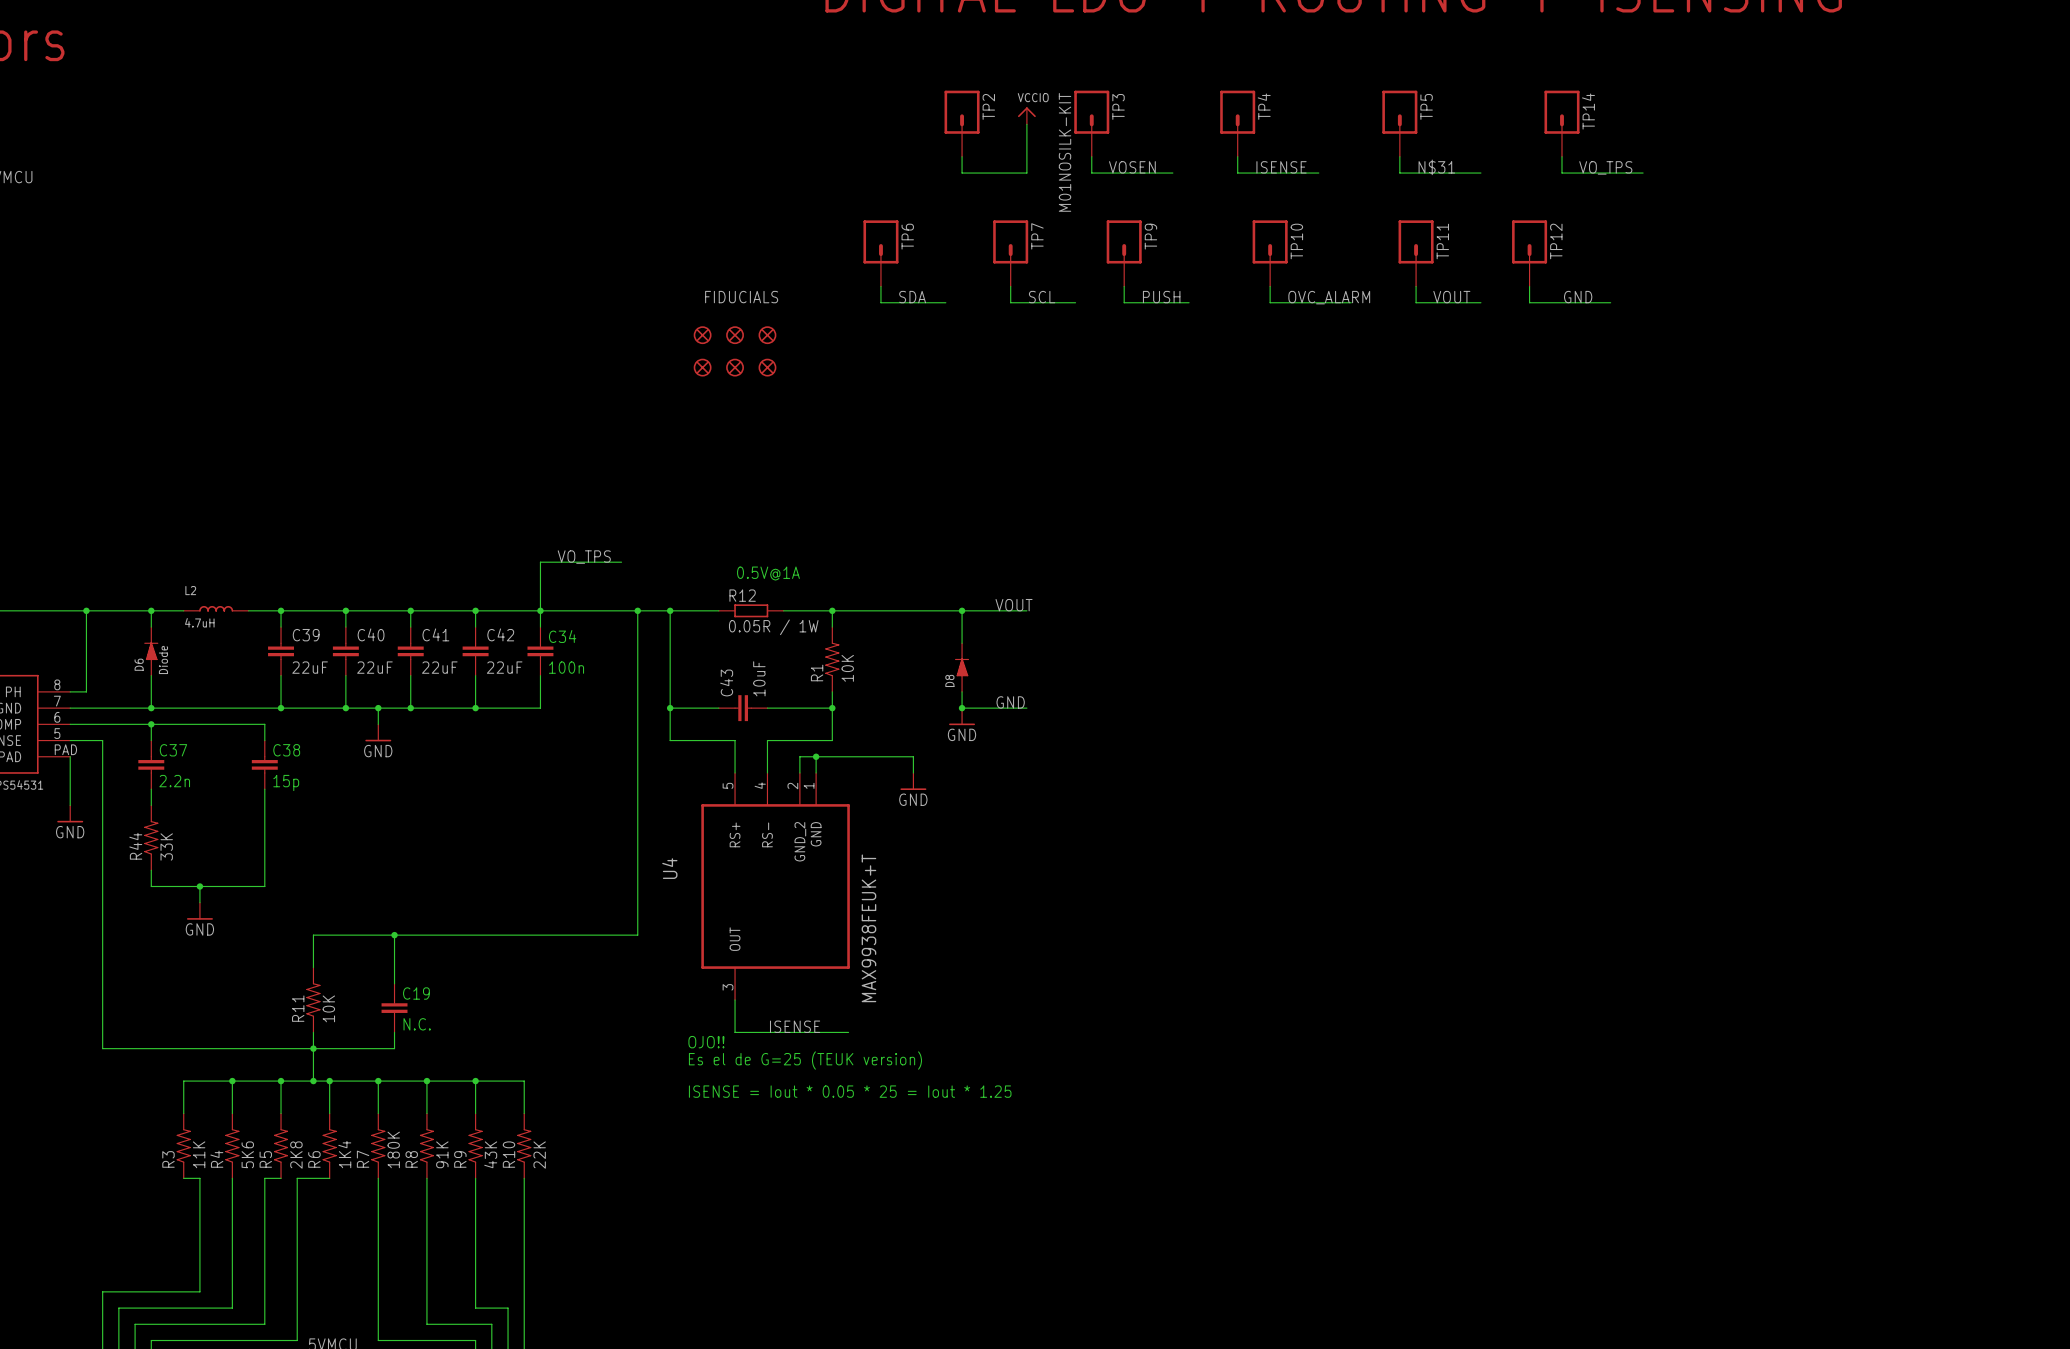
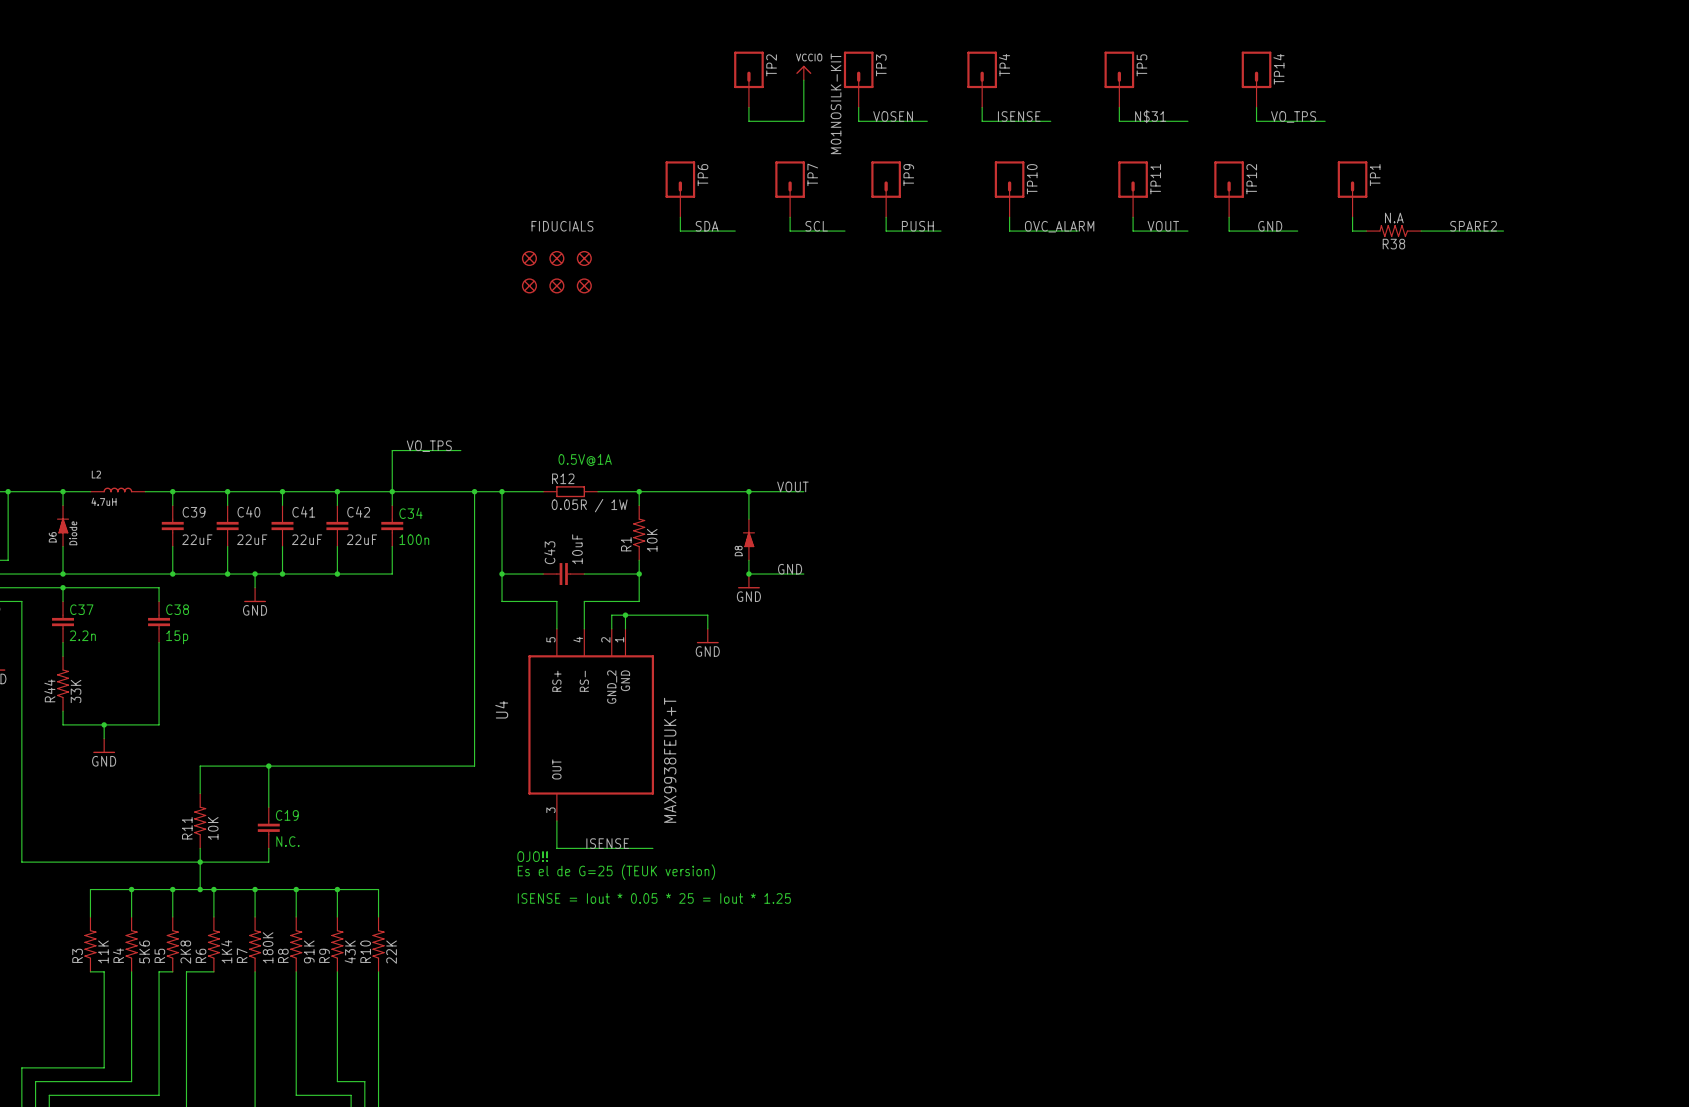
TP1: none -> (1352, 189)
wire: none -> (1352, 217) (1352, 231) (1366, 231)
label: none -> SPARE2 (1473, 226)
R38: none -> N.A (1393, 231)
wire: none -> (1421, 231) (1503, 231)

